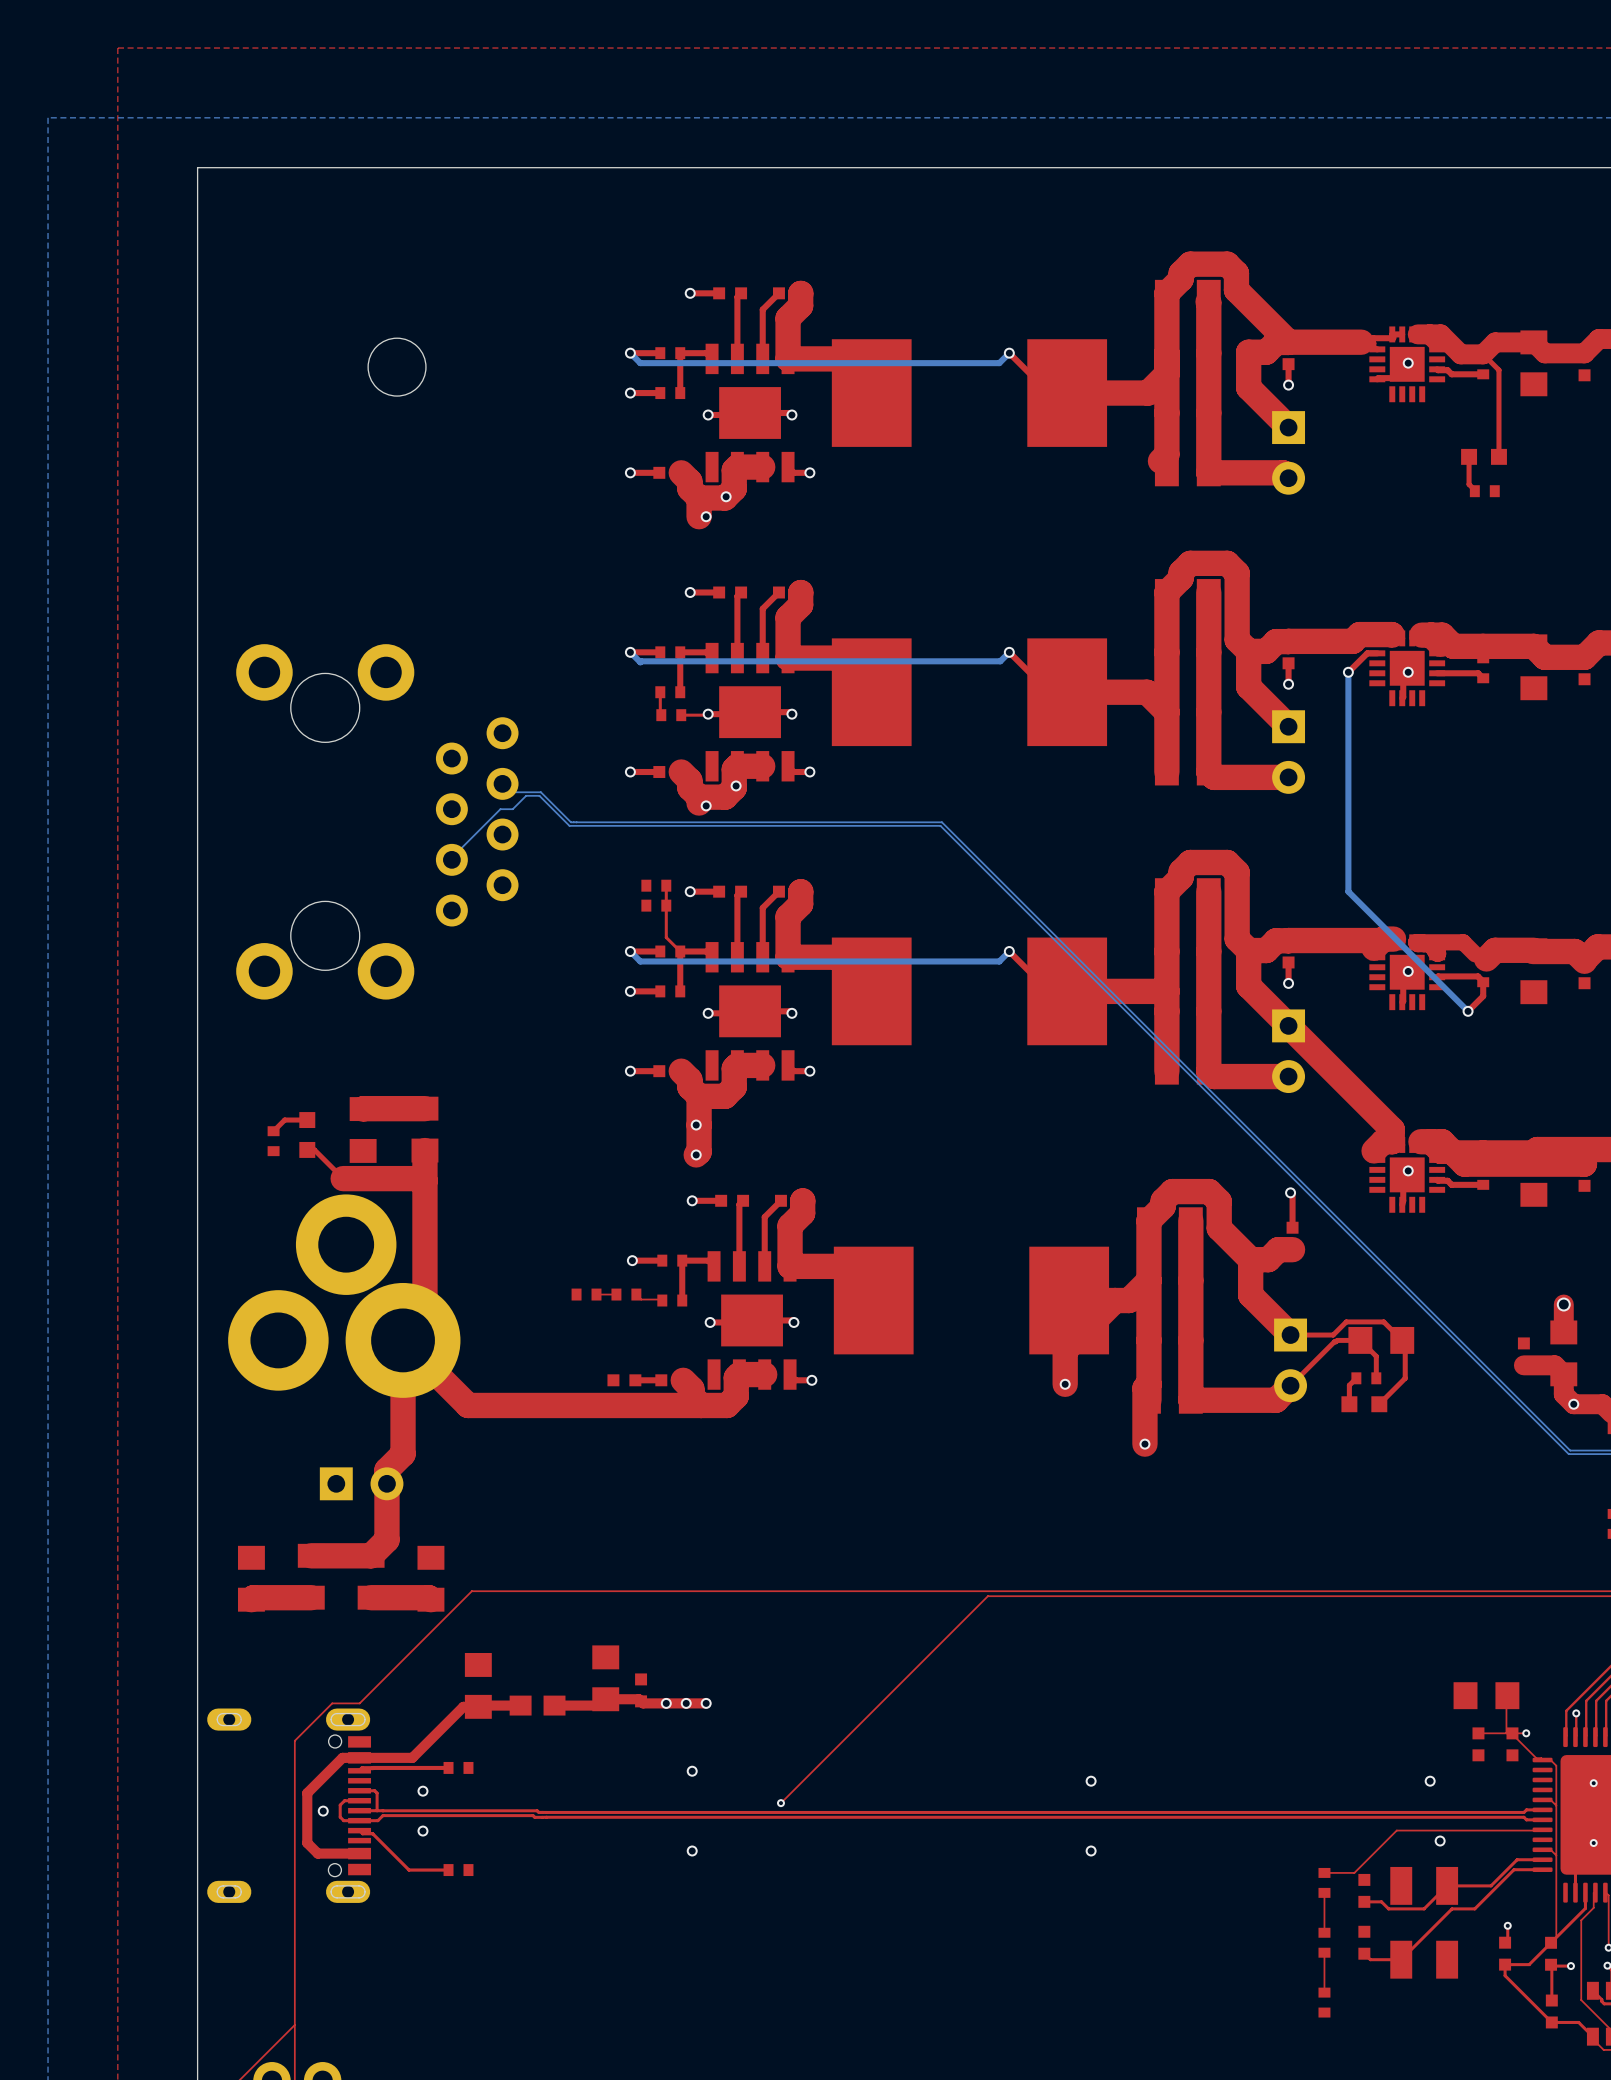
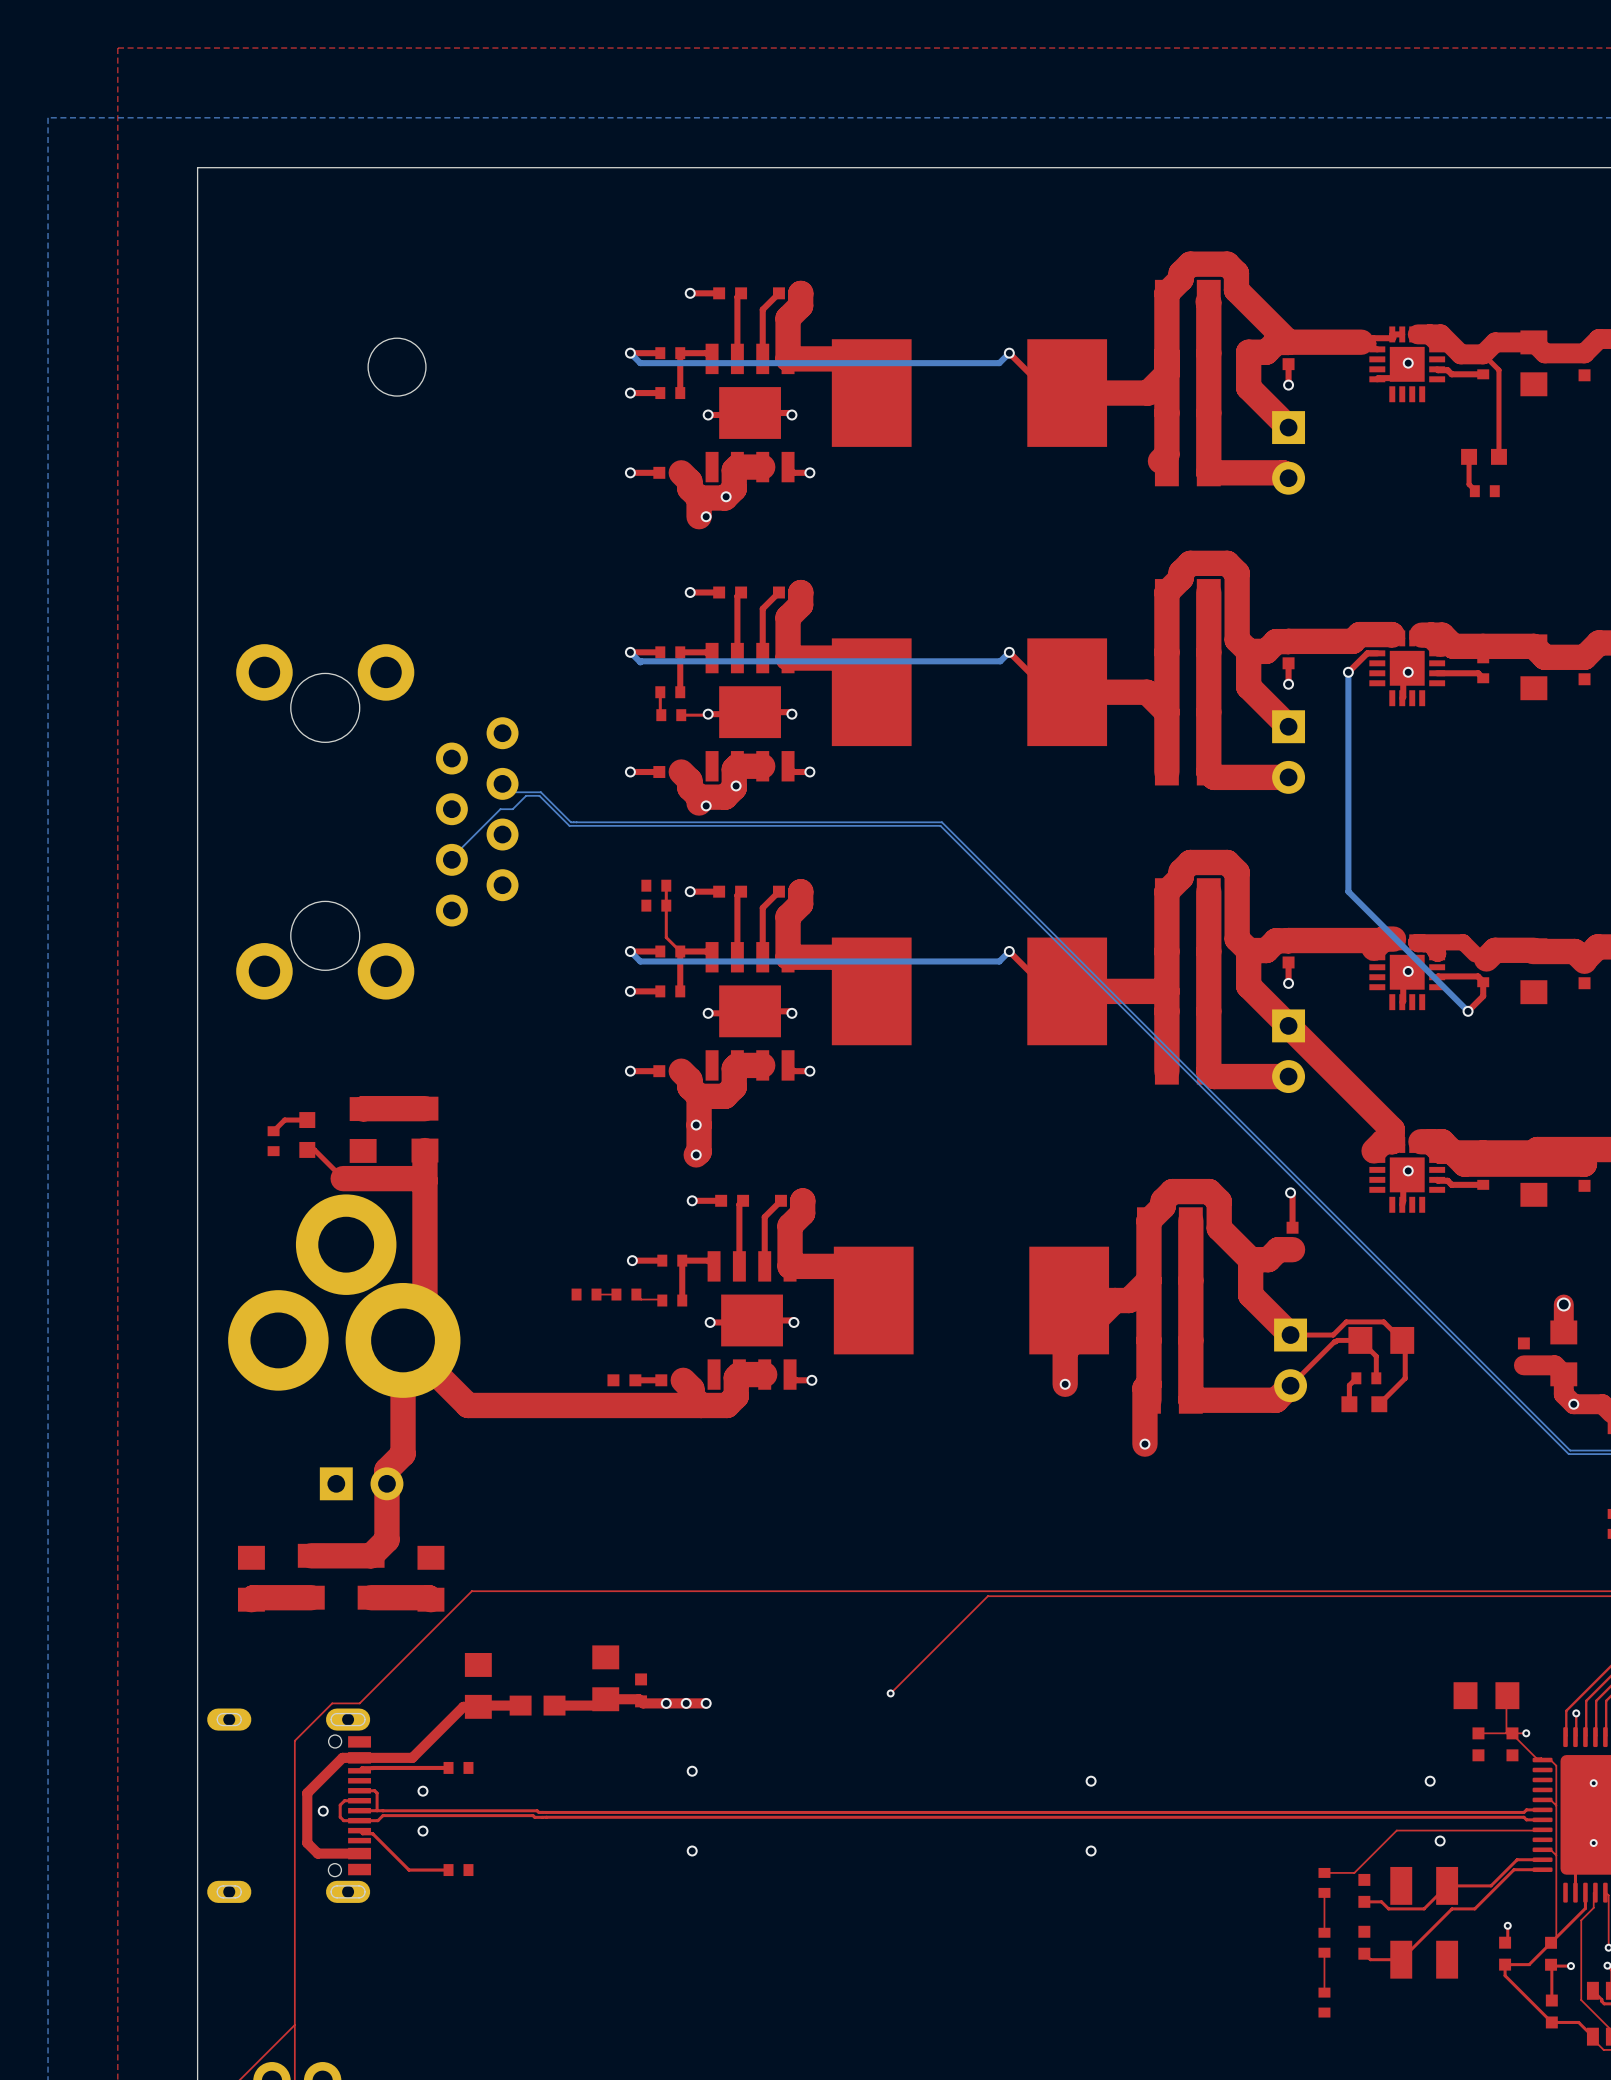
top track: (890, 1693) (780, 1803) -> none
via: none -> (890, 1693)
via: (780, 1803) -> none

